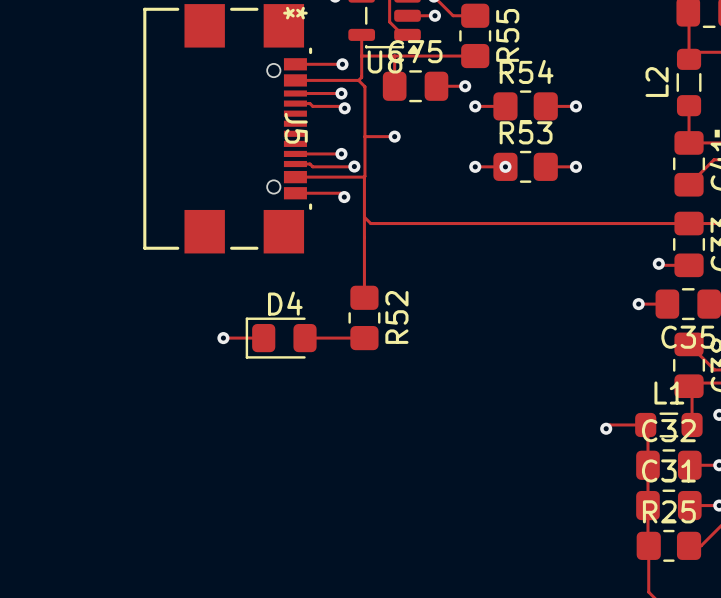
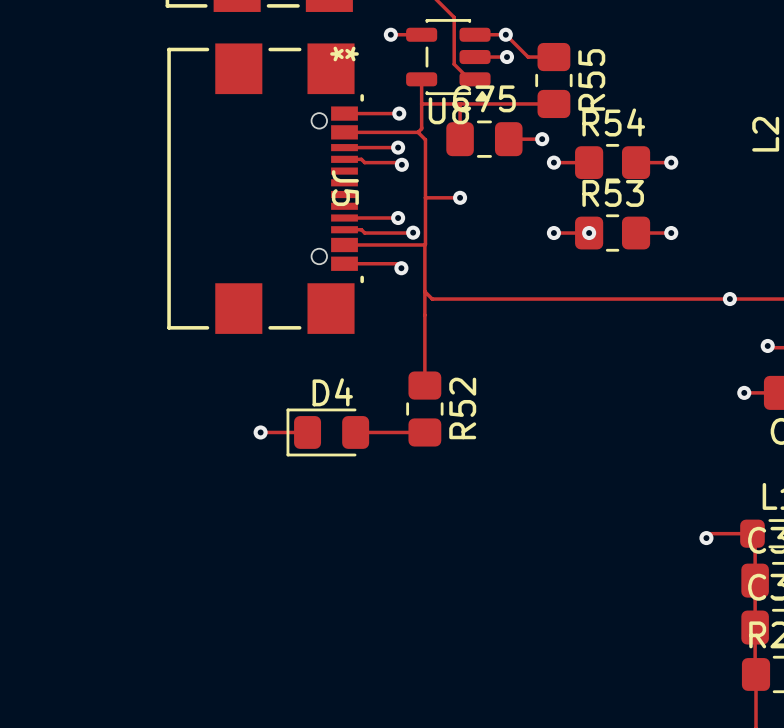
via: none -> (729, 299)

